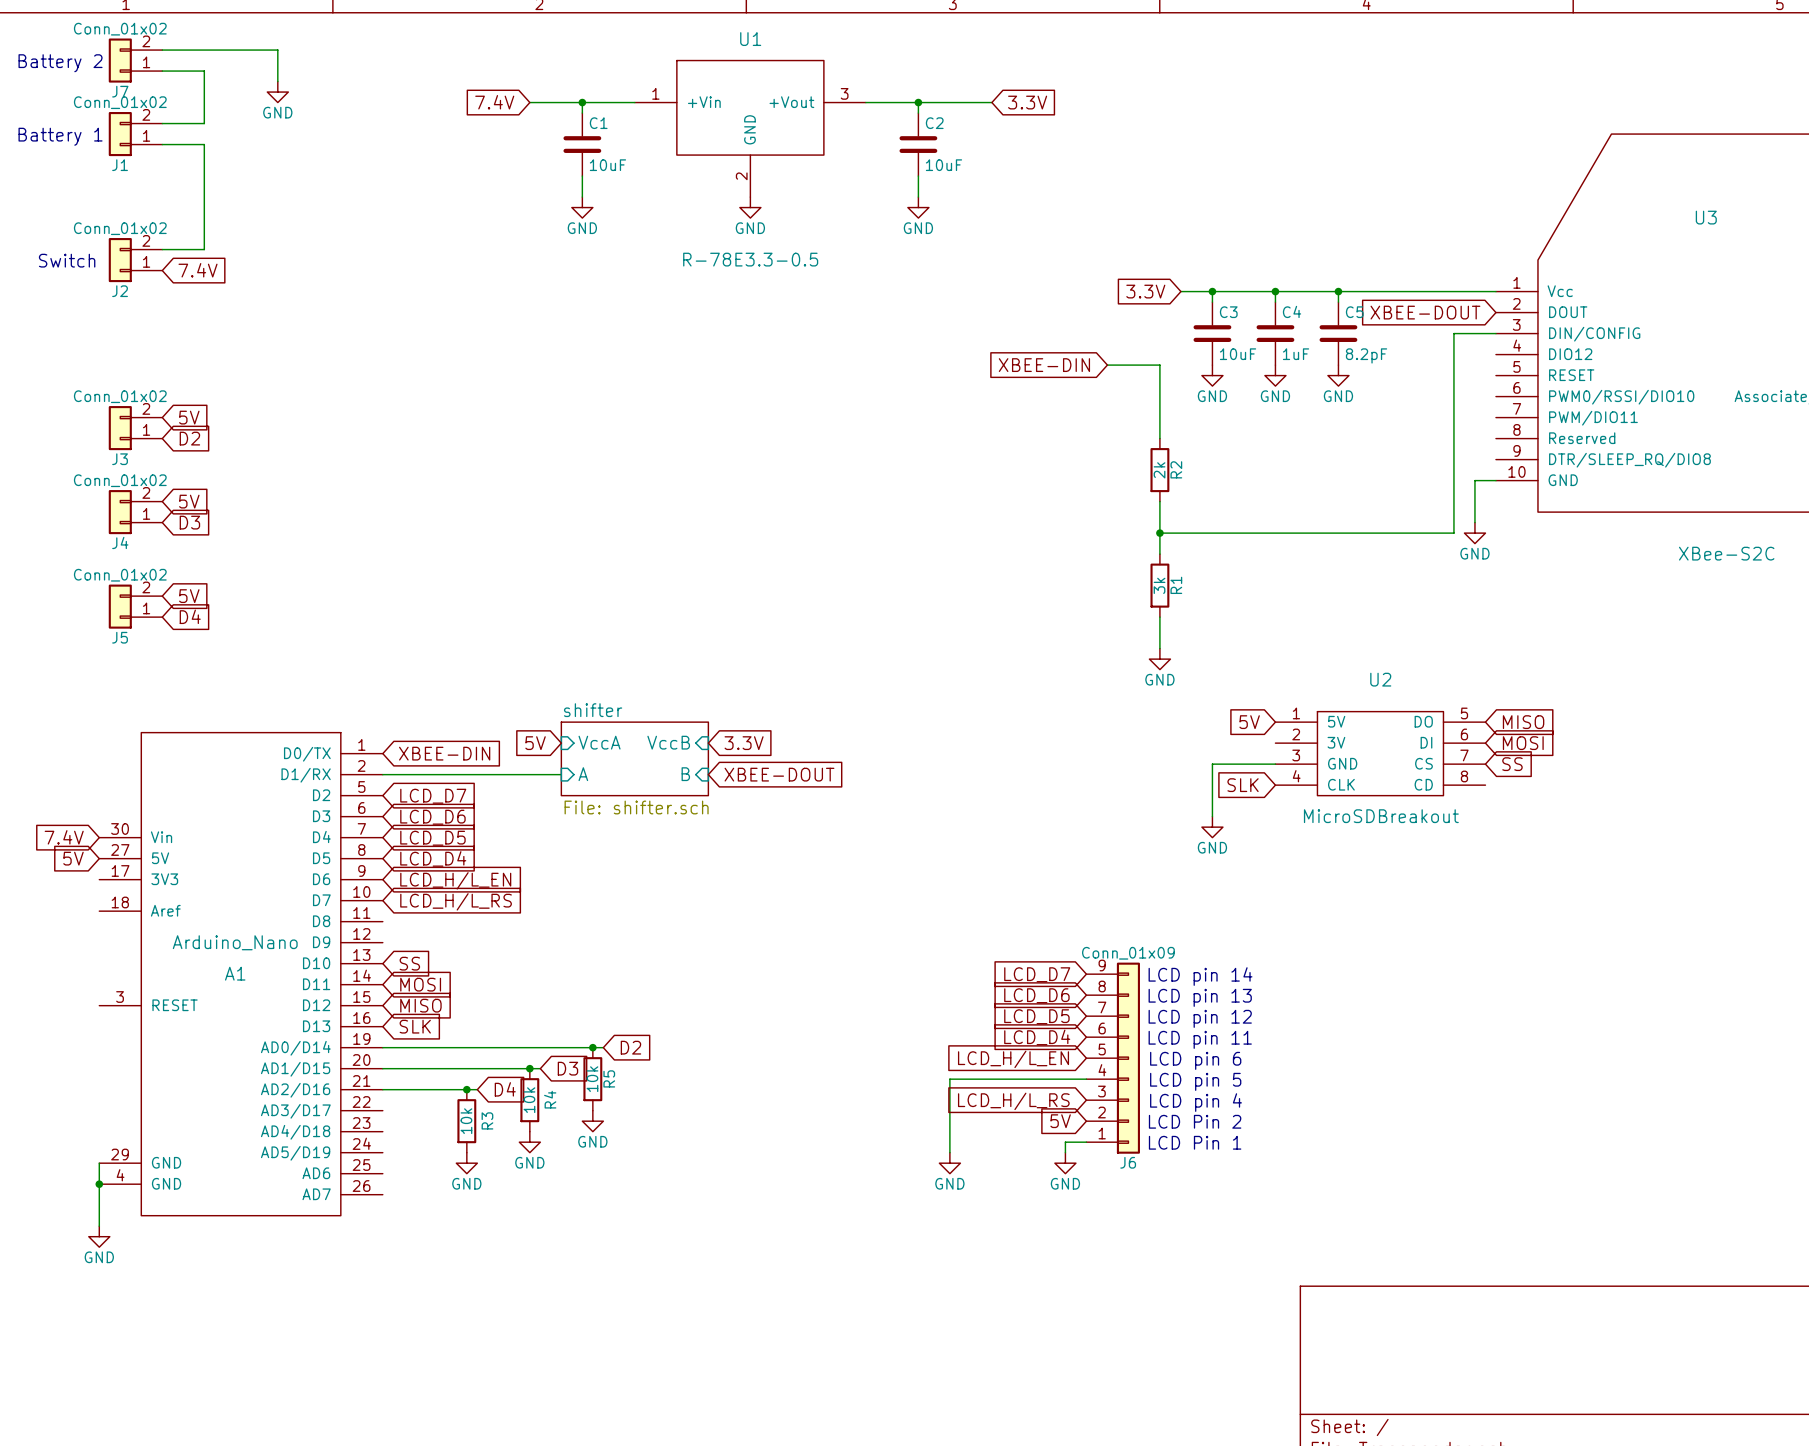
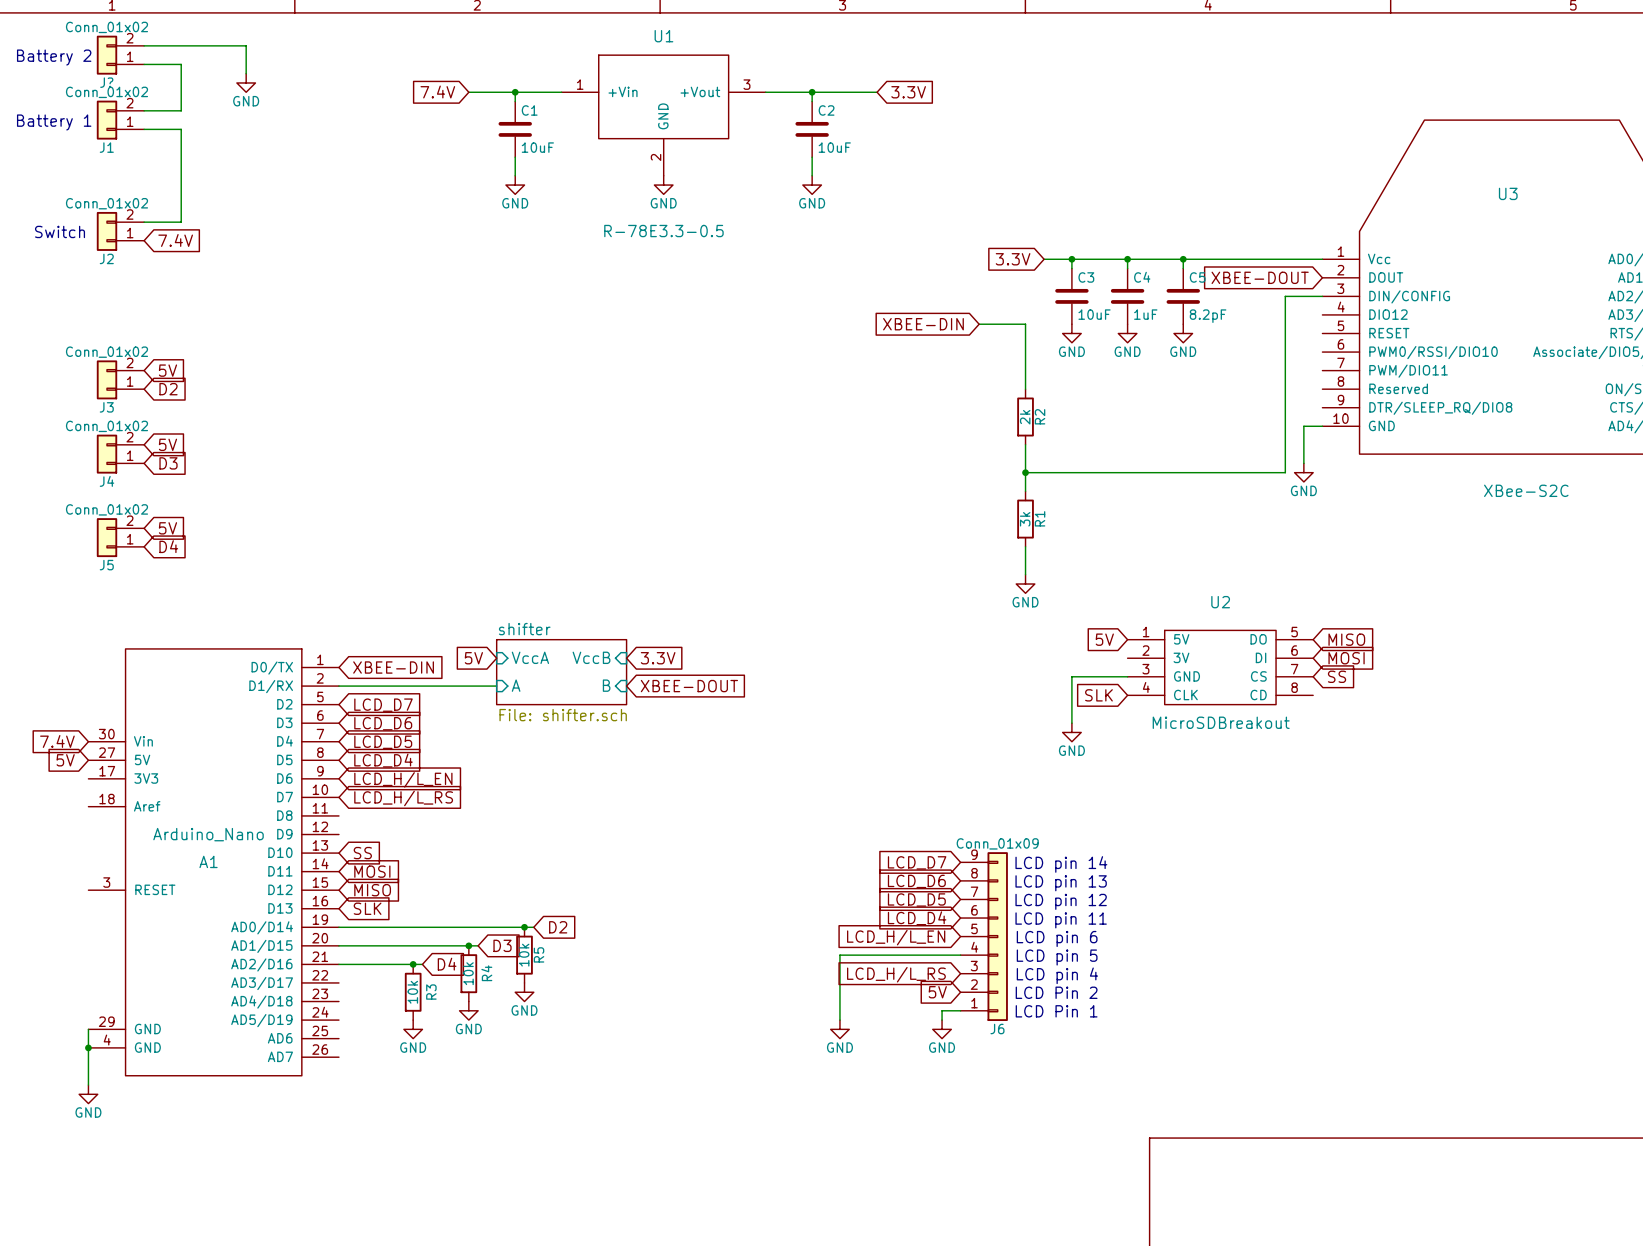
J7 name: J7 (120, 91) -> J? (106, 82)

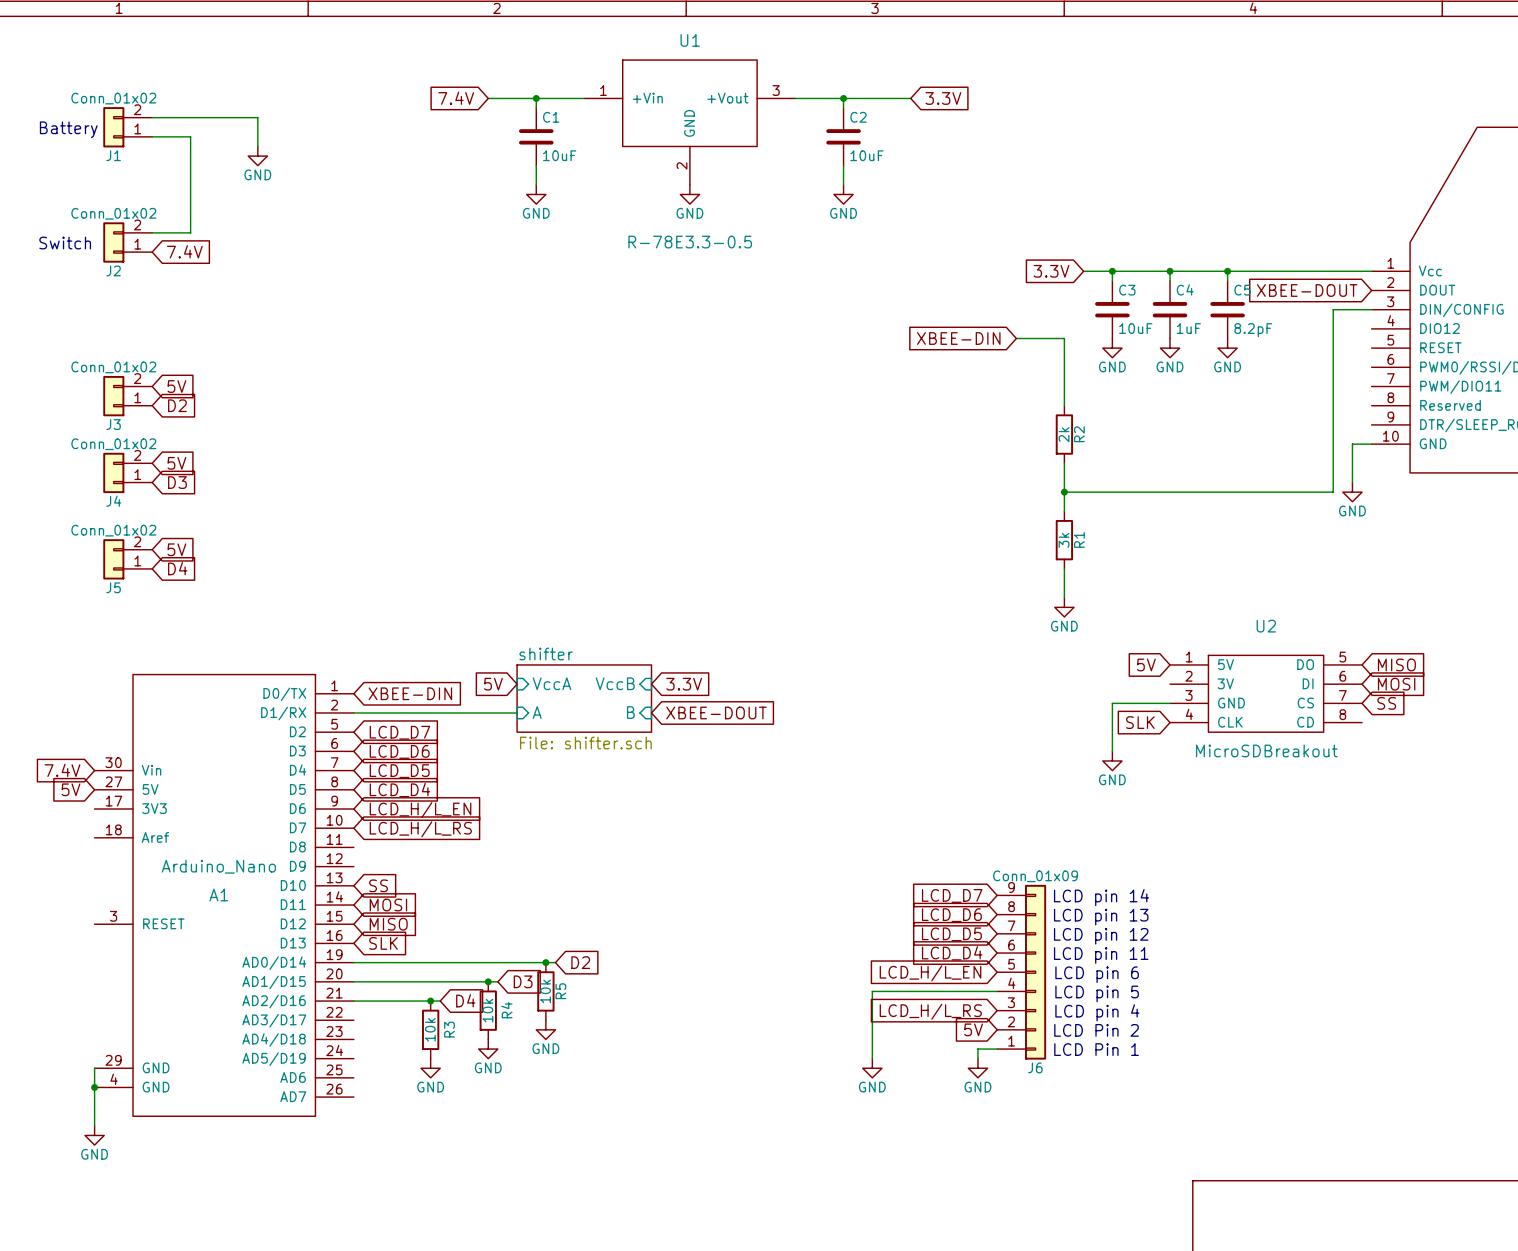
wire: (144, 45) (246, 45) (246, 73) -> none
J?: Conn_01x02 (120, 55) -> none
text: Battery 2 (54, 57) -> none
wire: (144, 64) (181, 64) (181, 110) -> (257, 146) (257, 117) (190, 117)
power symbol position: GND (246, 82) -> GND (257, 156)
text: Battery 1 (54, 122) -> Battery (68, 129)

